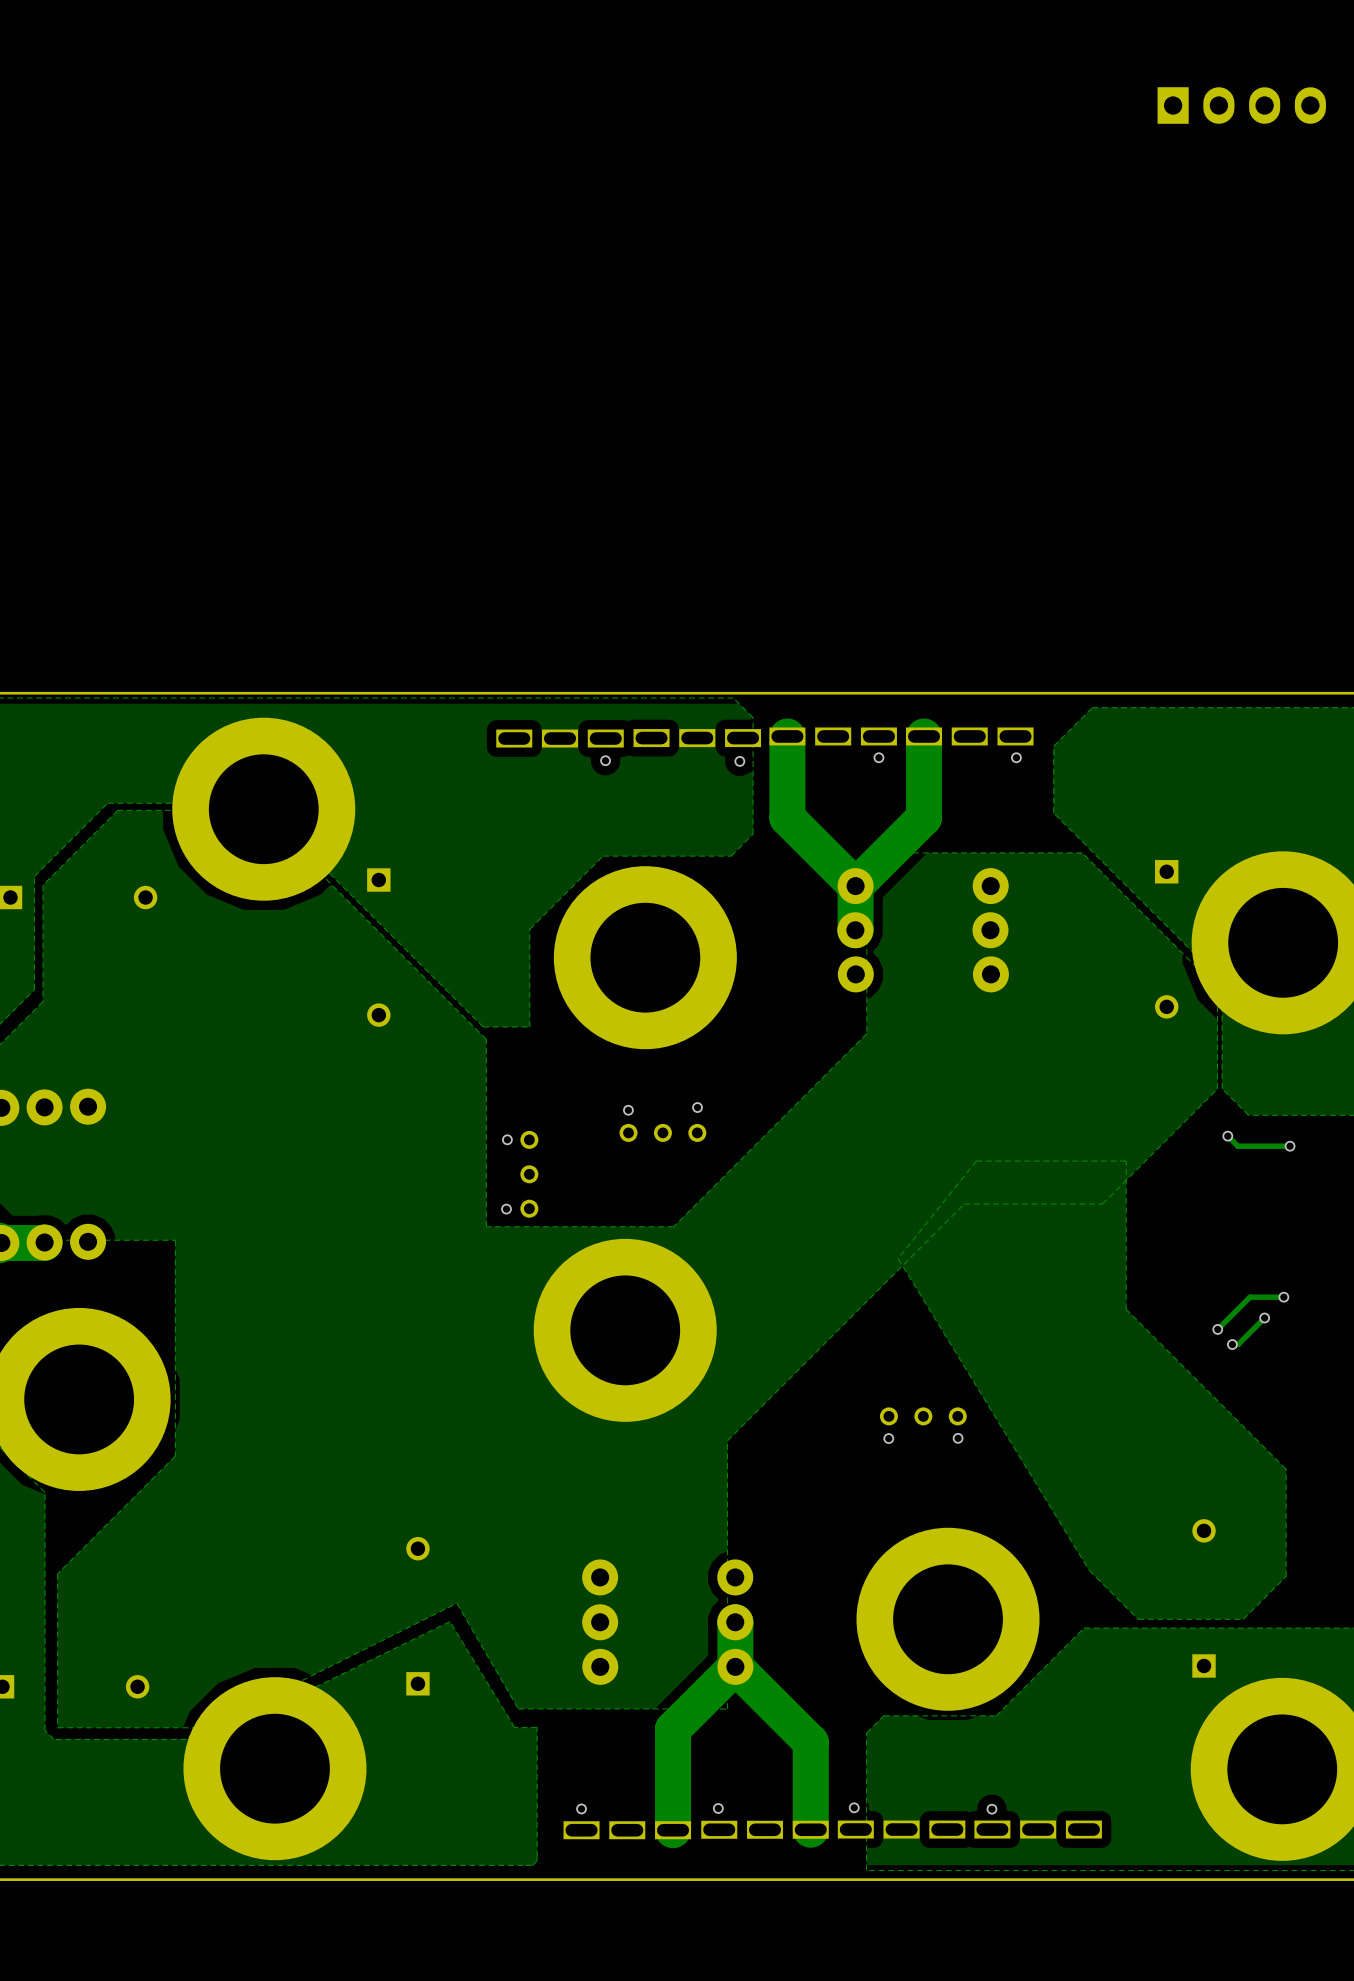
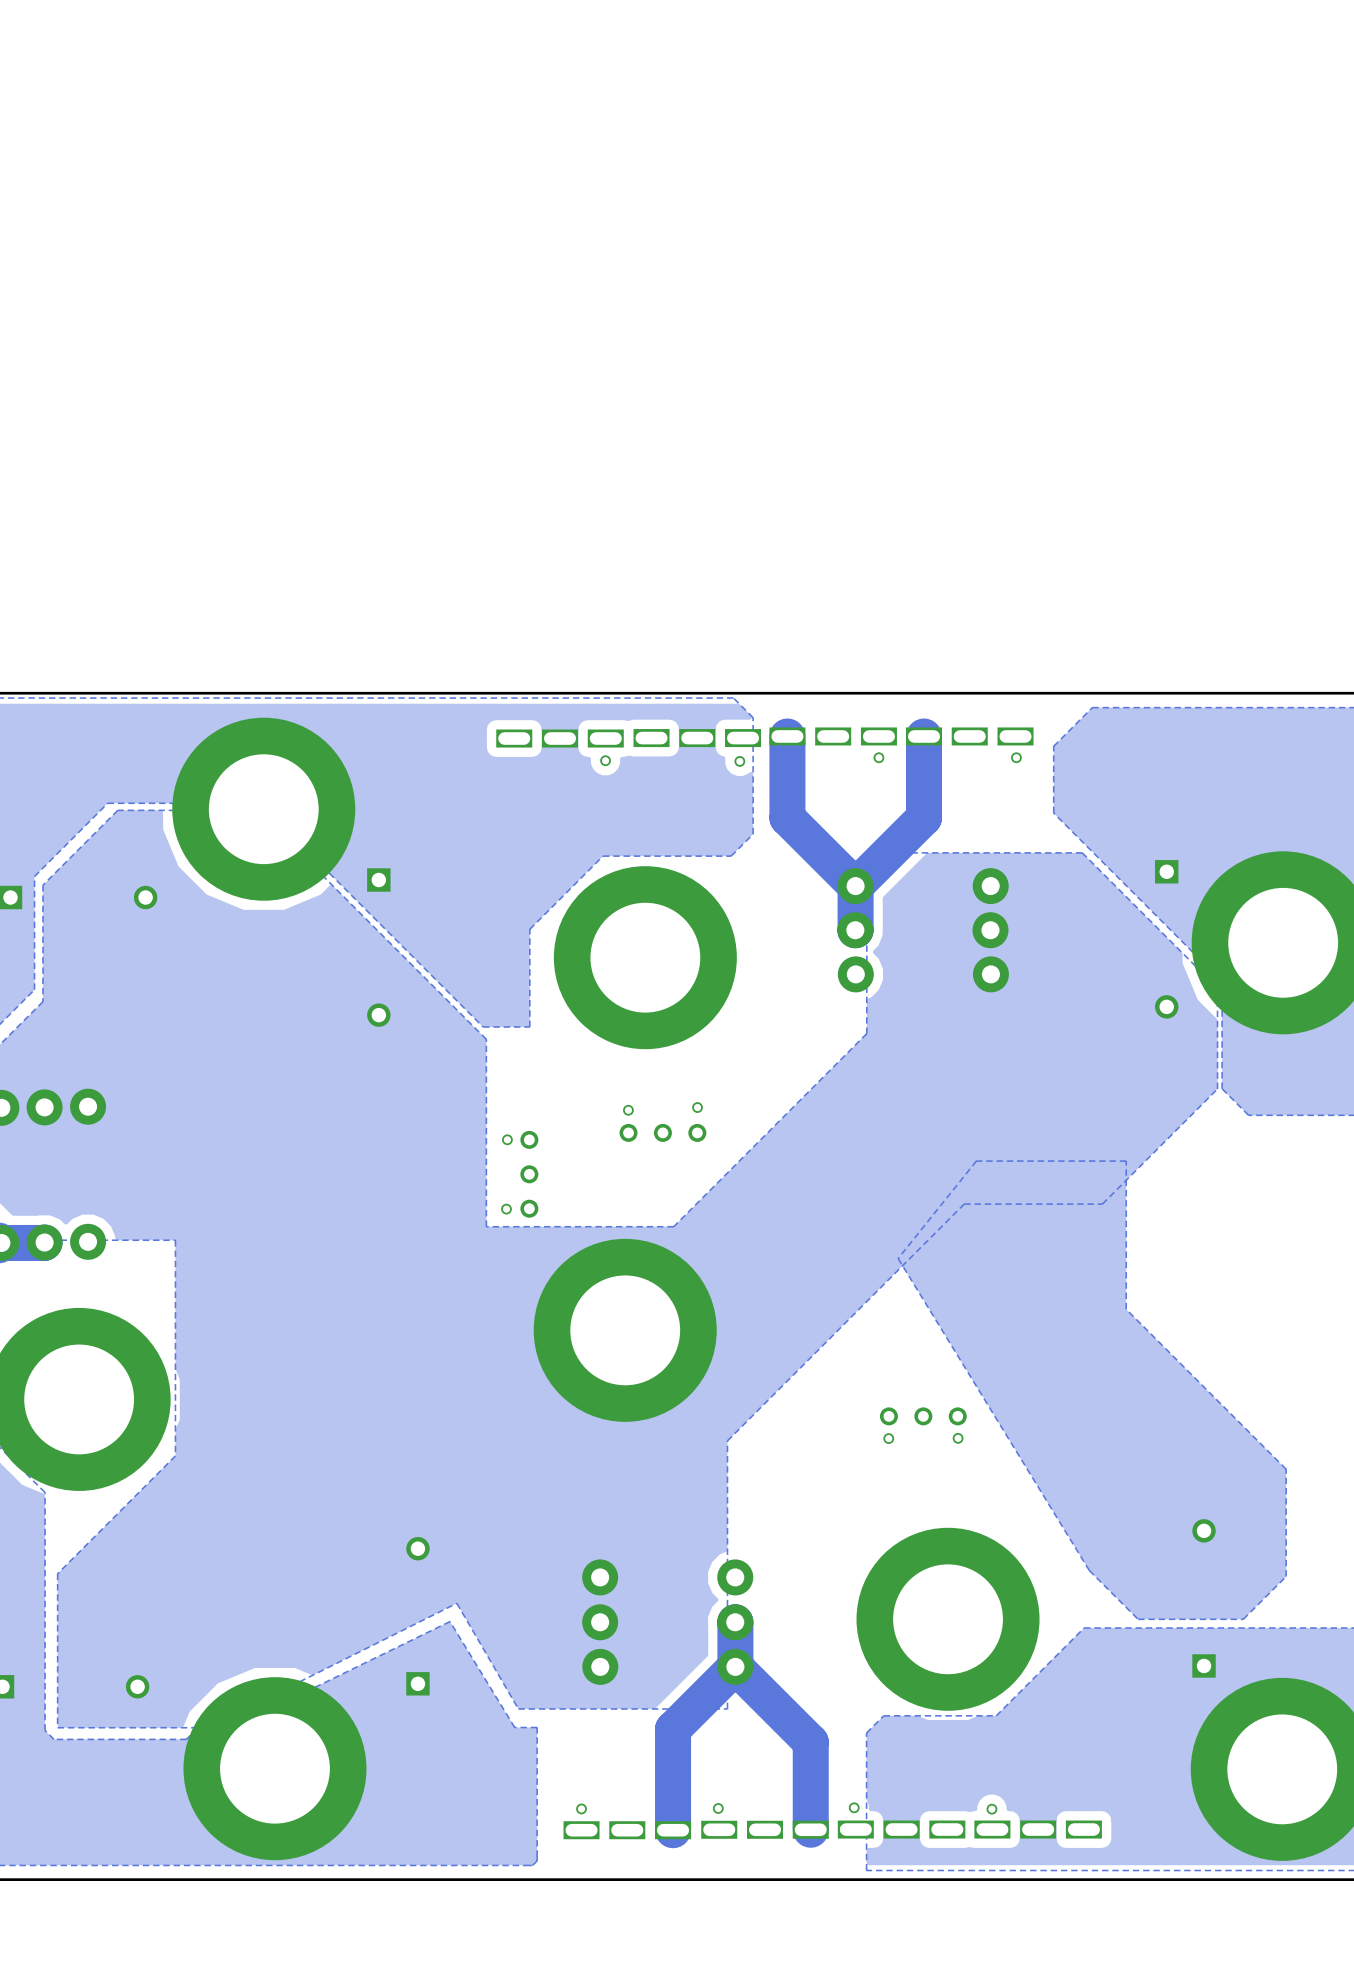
part: (1241, 105) -> none
track: (1227, 1136) (1237, 1146) (1290, 1146) -> none
via: (1227, 1136) -> none
via: (1290, 1146) -> none
track: (1283, 1297) (1250, 1297) (1217, 1329) -> none
via: (1283, 1297) -> none
track: (1264, 1318) (1238, 1344) (1232, 1344) -> none
via: (1264, 1318) -> none
via: (1217, 1329) -> none
via: (1232, 1344) -> none

